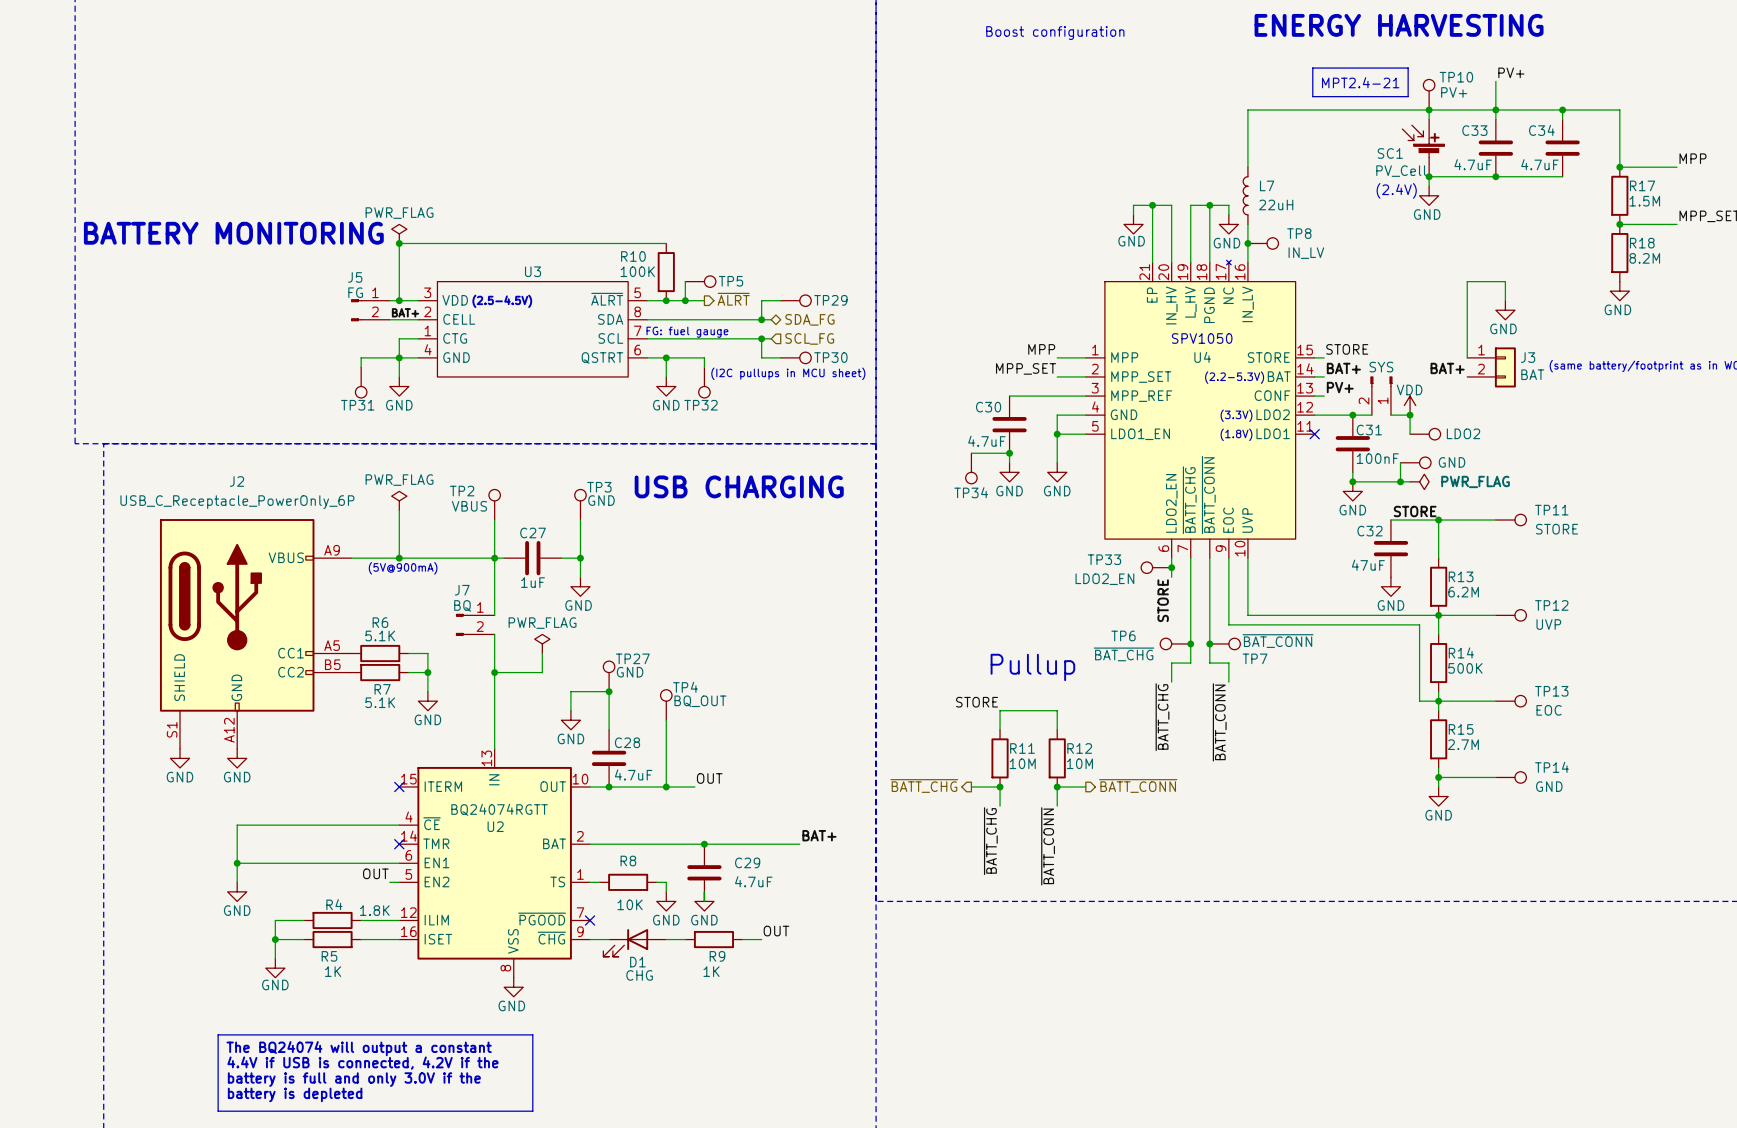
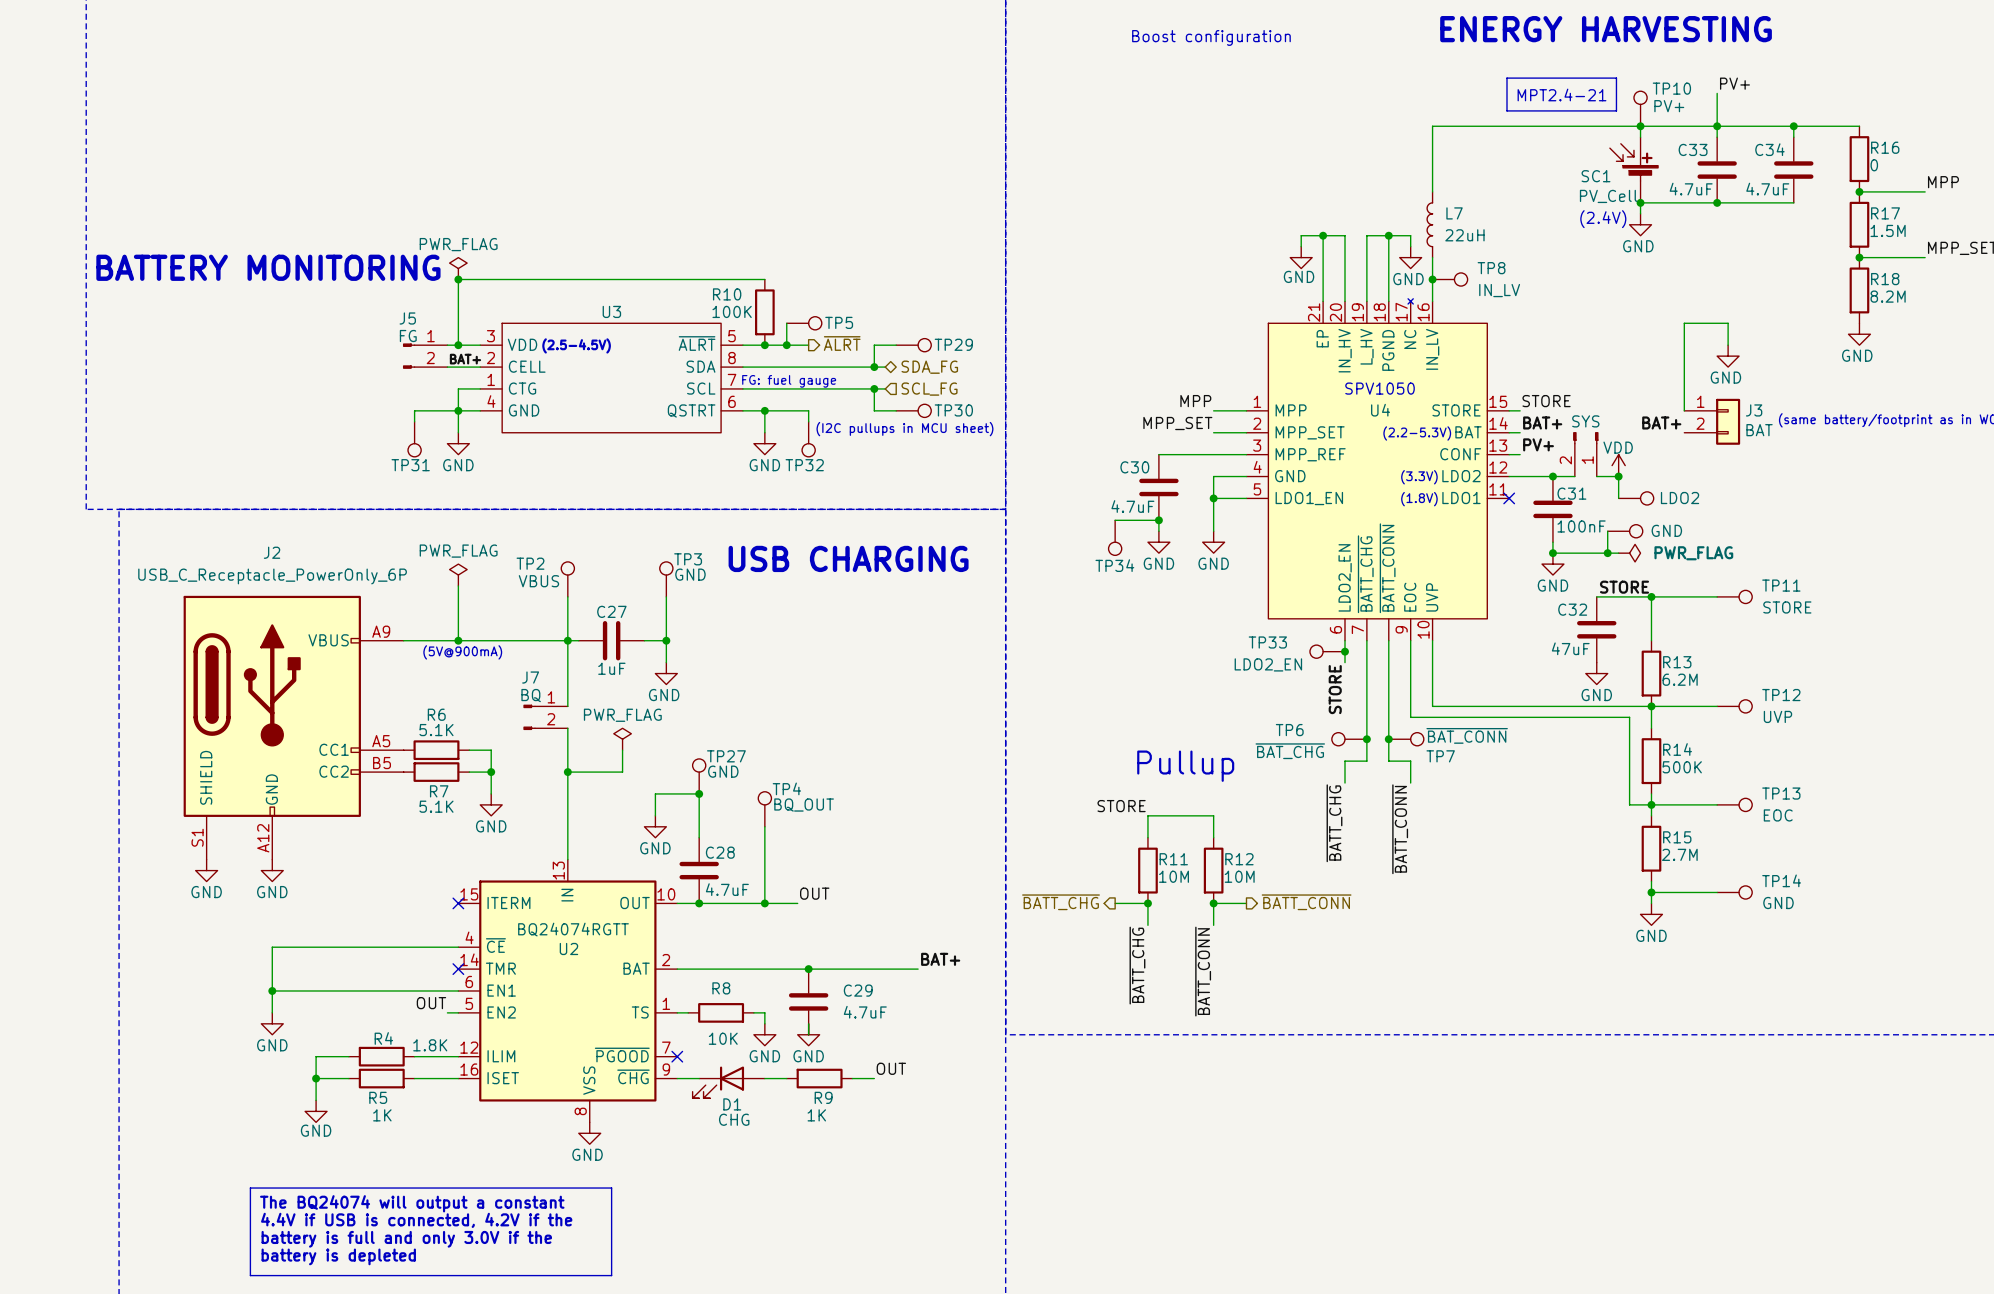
wire: (1619, 109) (1619, 167) -> none
R16: none -> 0 (1859, 159)

